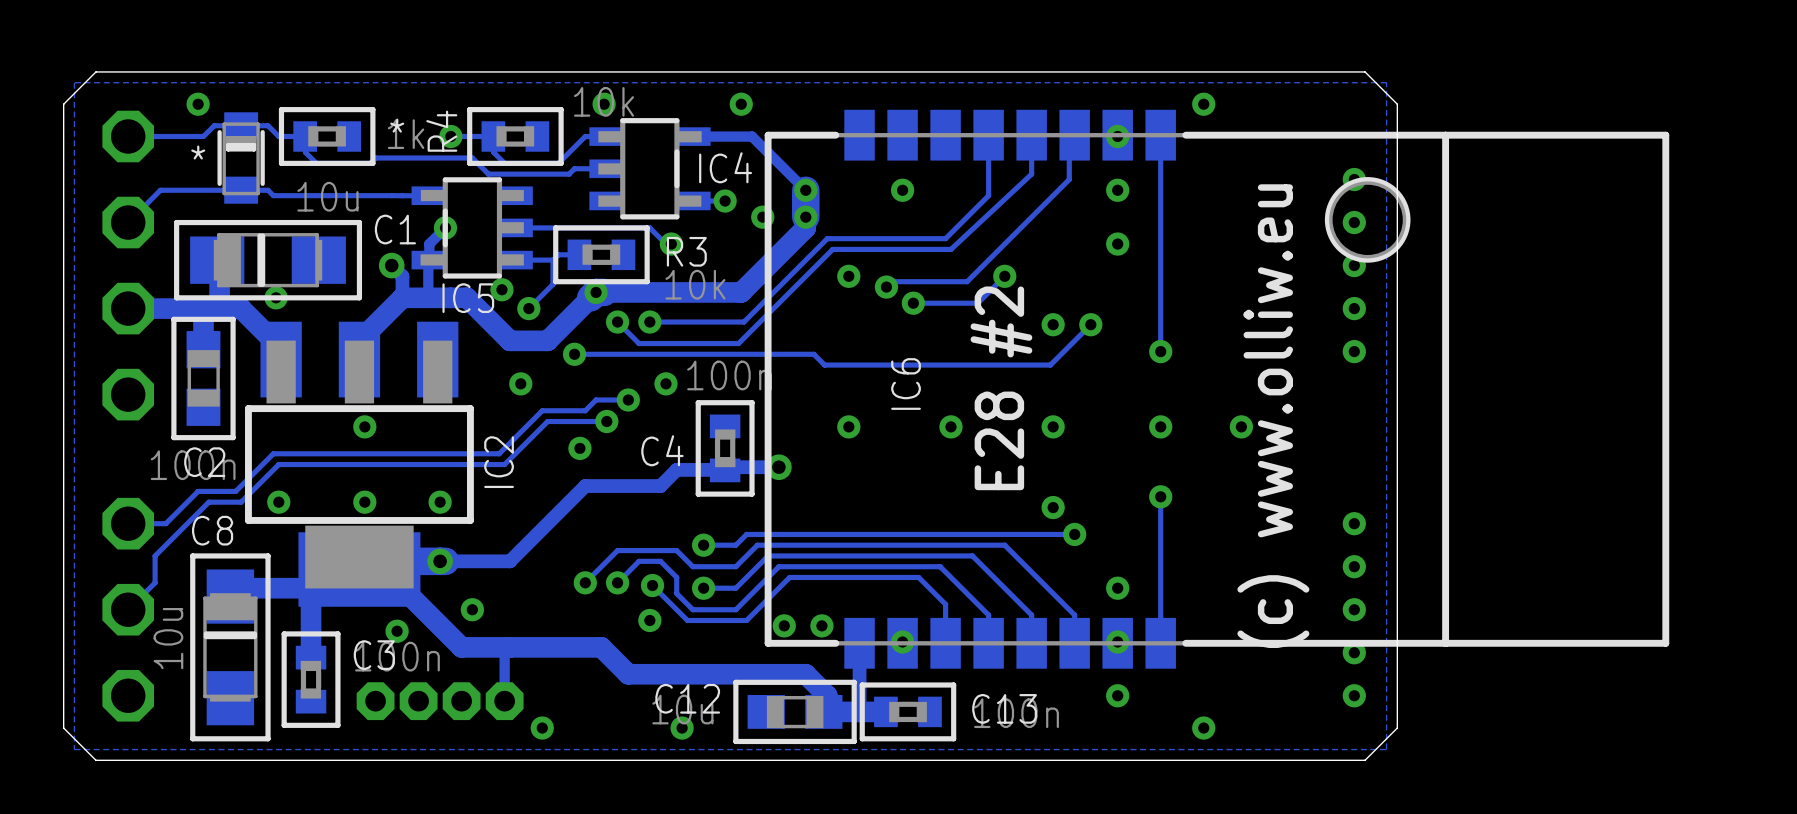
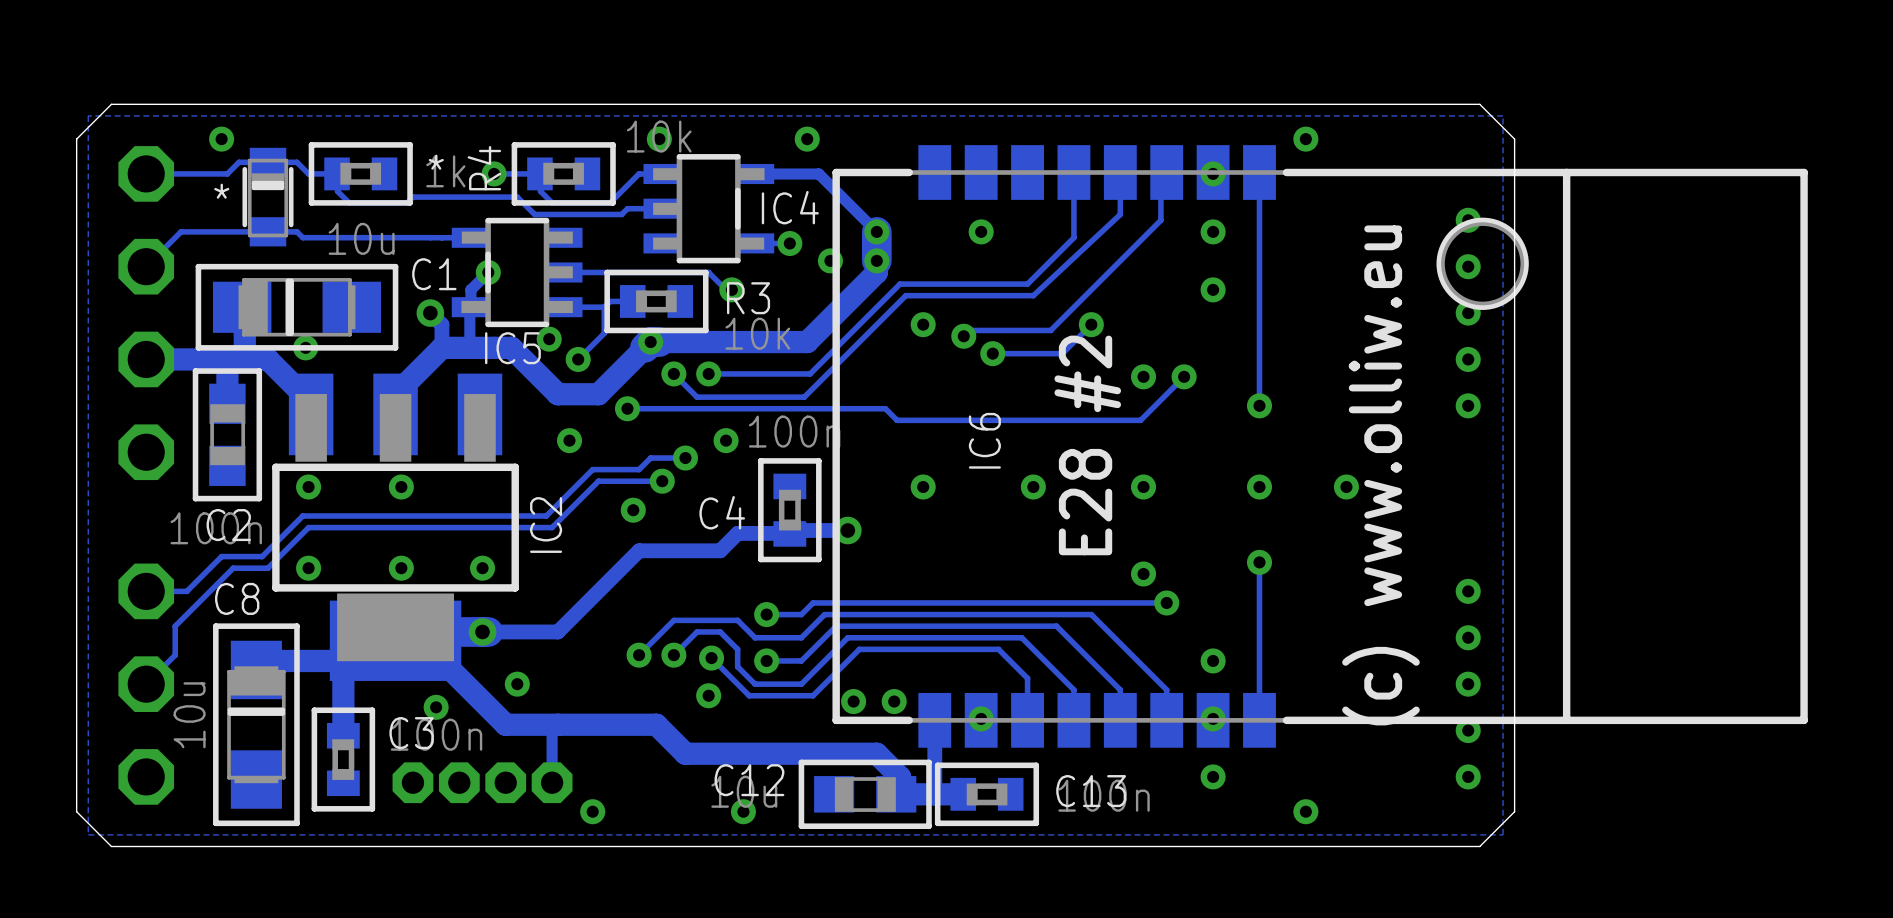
via: none -> (308, 487)

